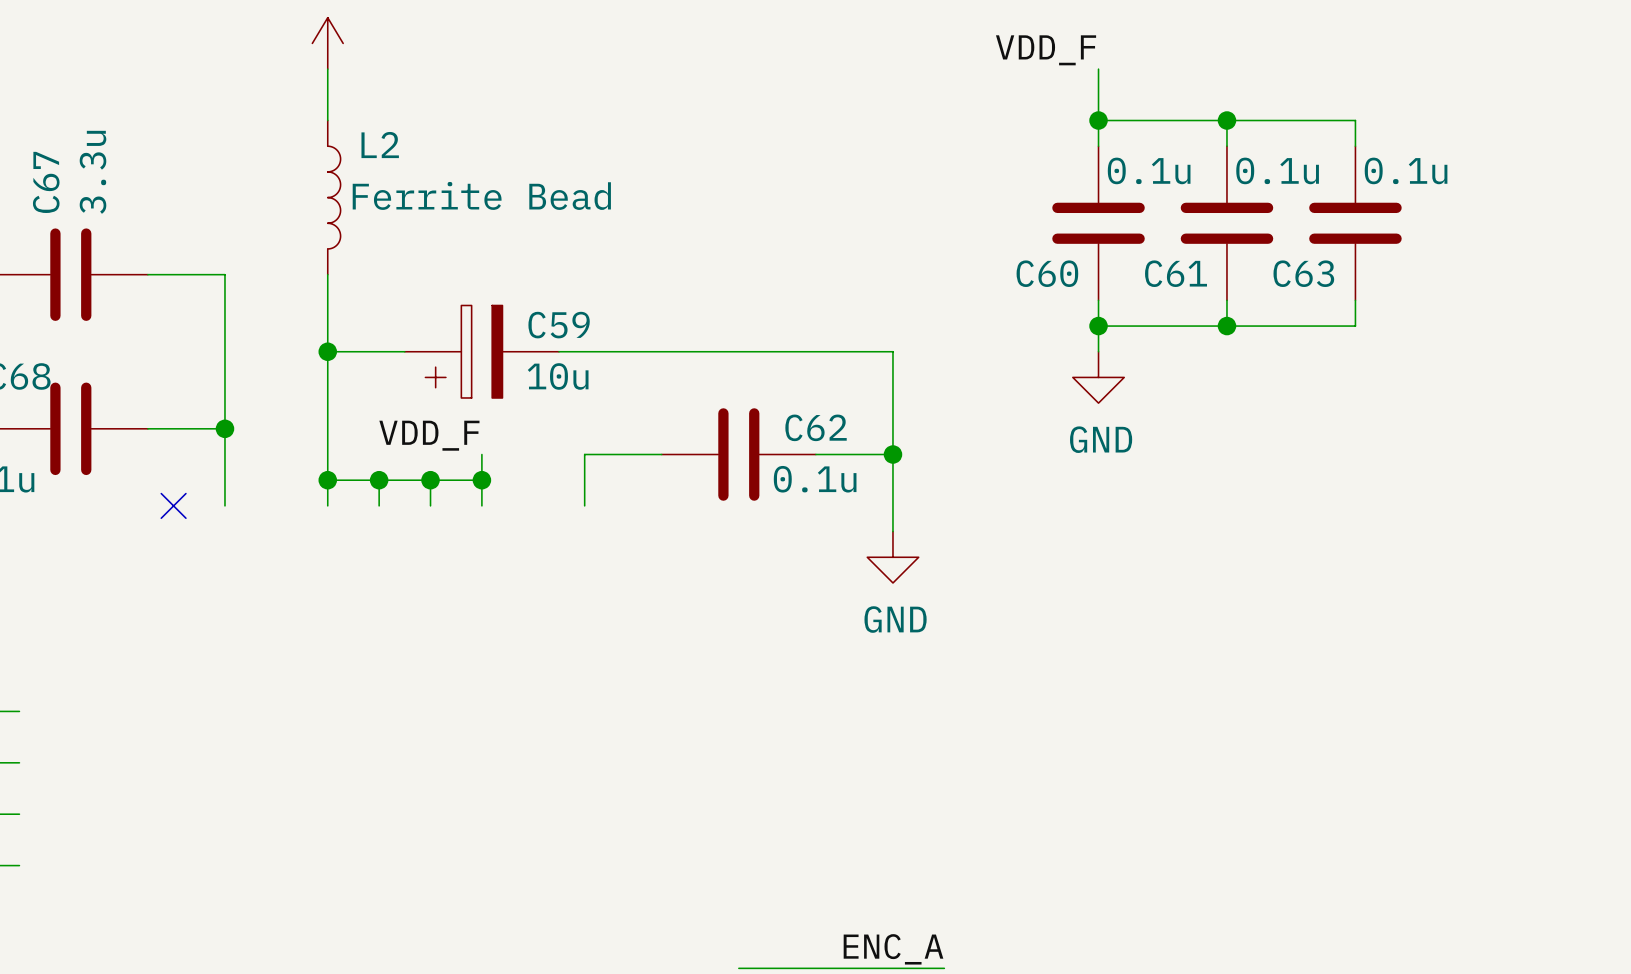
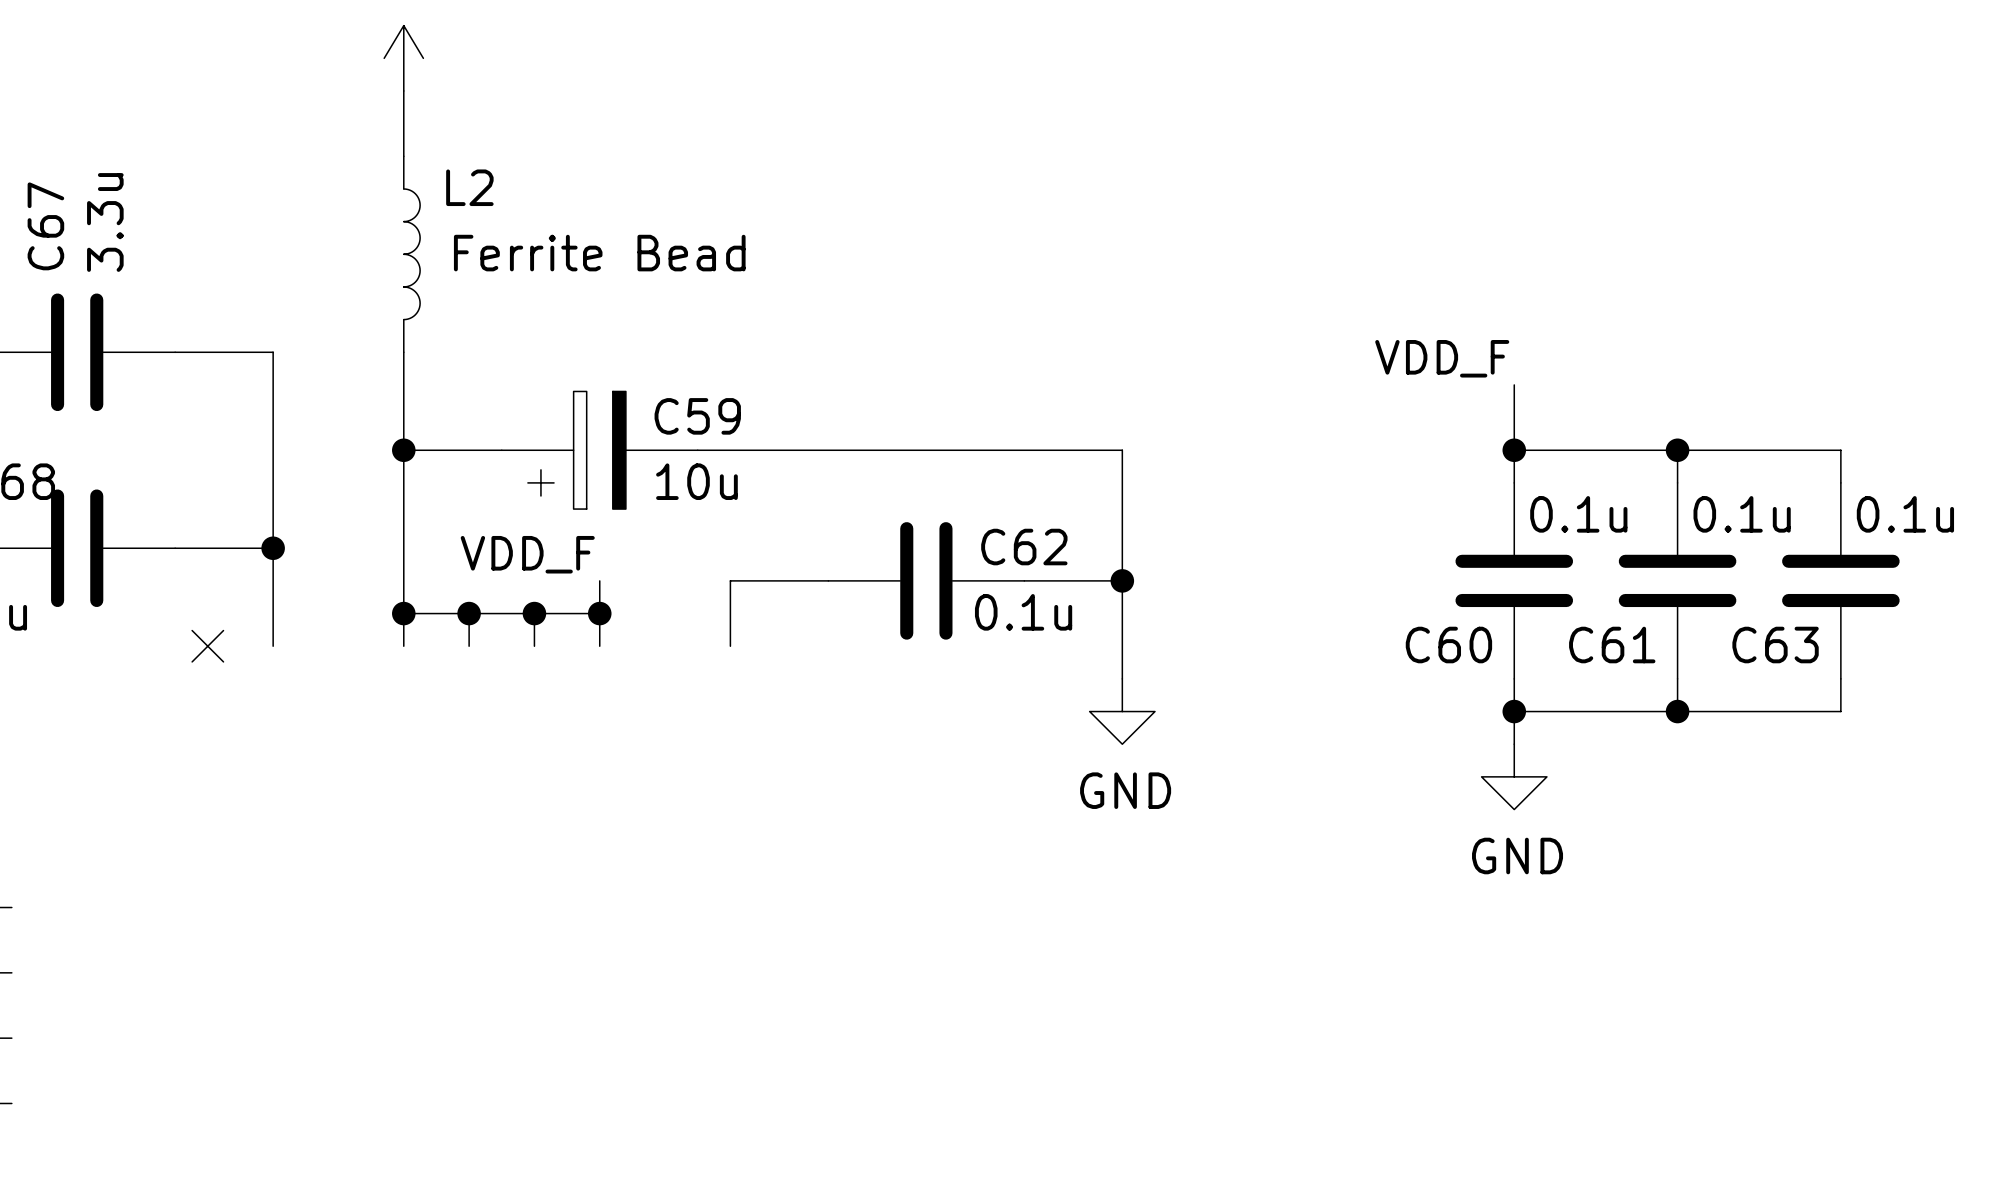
label position: VDD_F (1046, 50) -> VDD_F (1442, 358)
wire: (1098, 69) (1098, 146) -> (1514, 384) (1514, 482)
wire: (1098, 120) (1355, 120) (1355, 146) -> (1514, 450) (1840, 450) (1840, 482)
junction: (1098, 120) -> none
wire: (1226, 120) (1226, 146) -> (1677, 450) (1677, 482)
junction: (1226, 120) -> none
C60 position: (1098, 223) -> (1514, 580)
C61 position: (1226, 223) -> (1677, 580)
C63 position: (1355, 223) -> (1840, 580)
wire: (1098, 300) (1098, 351) -> (1514, 678) (1514, 744)
wire: (1226, 300) (1226, 326) -> (1677, 678) (1677, 711)
wire: (1355, 300) (1355, 326) (1098, 326) -> (1840, 678) (1840, 711) (1514, 711)
junction: (1098, 326) -> none
junction position: (1226, 326) -> (1514, 450)
junction: none -> (1677, 450)
power symbol position: GND (1098, 377) -> GND (1514, 776)
junction: none -> (1514, 711)
junction: none -> (1677, 711)

